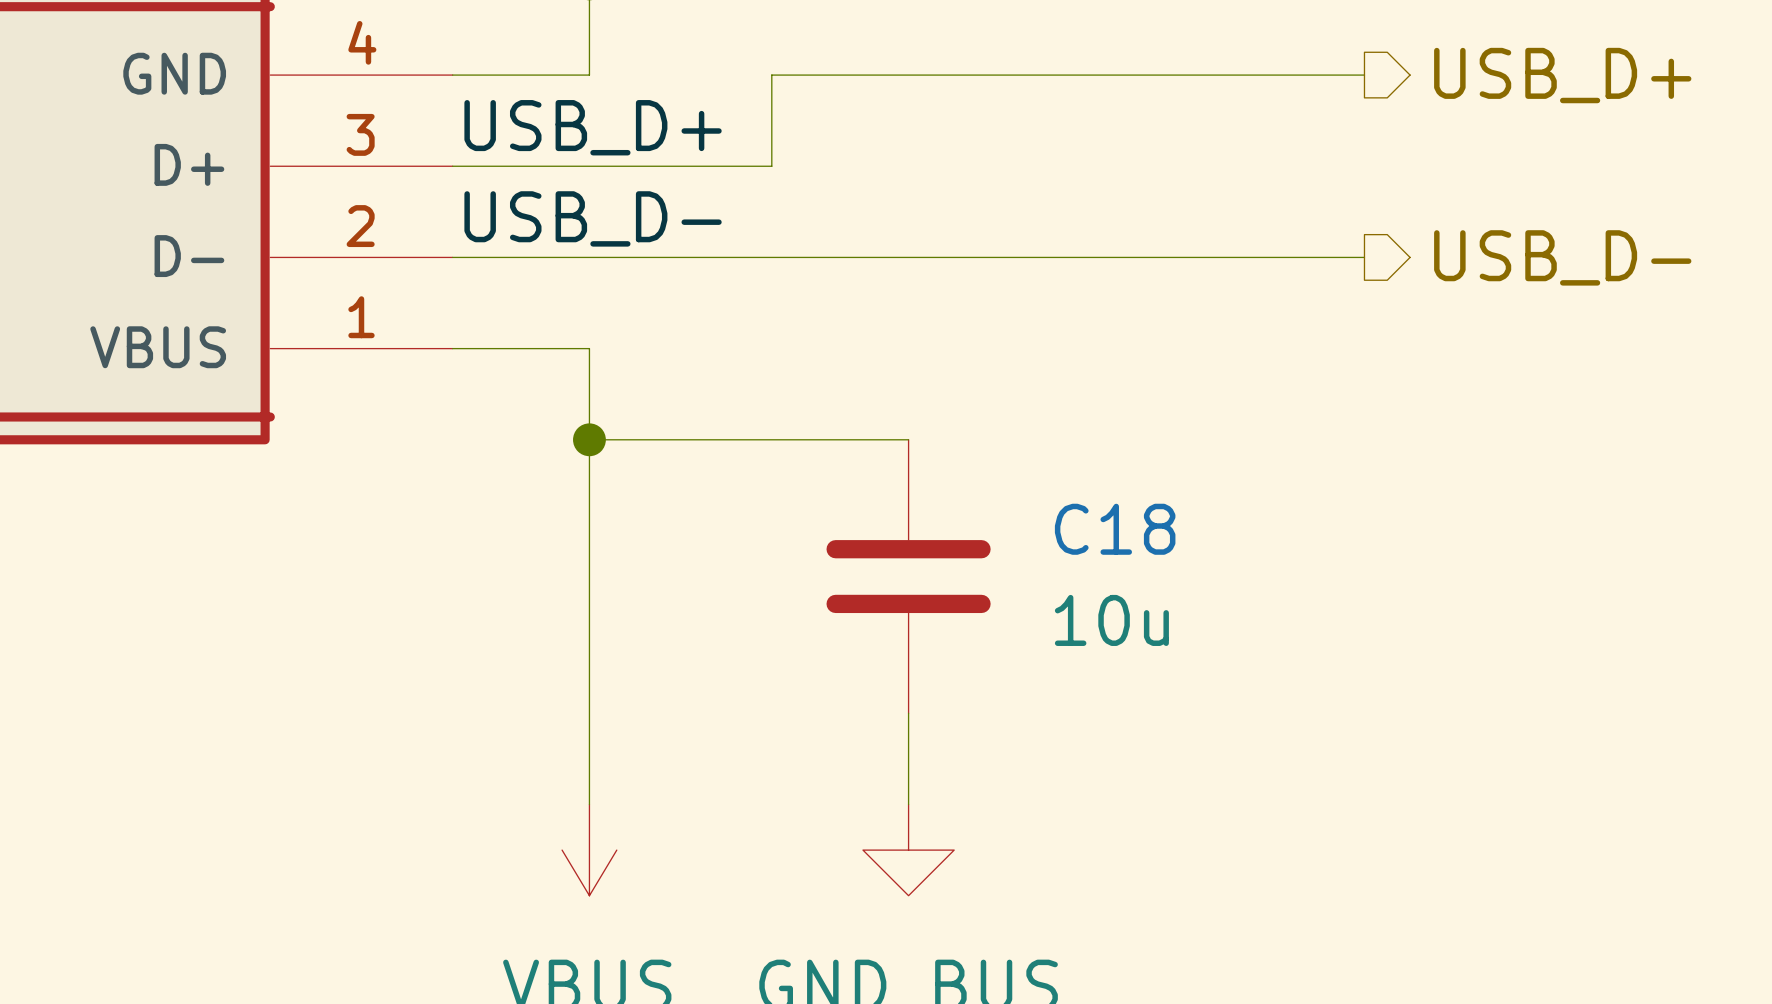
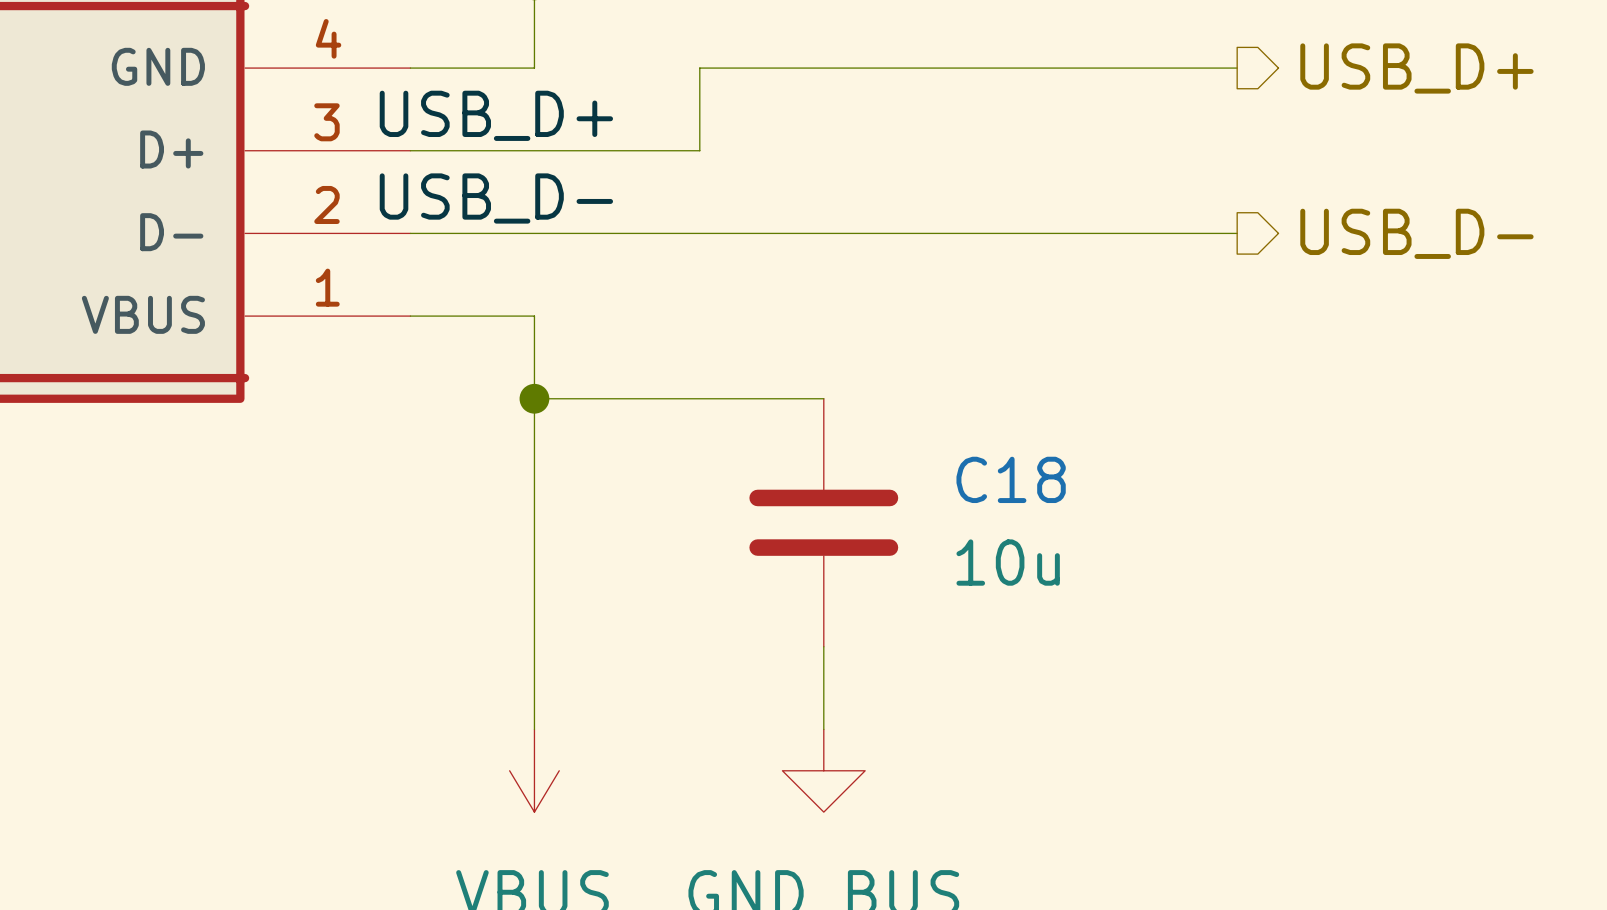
label position: USB_D+ (593, 127) -> USB_D+ (496, 115)
label position: USB_D- (593, 218) -> USB_D- (496, 198)

